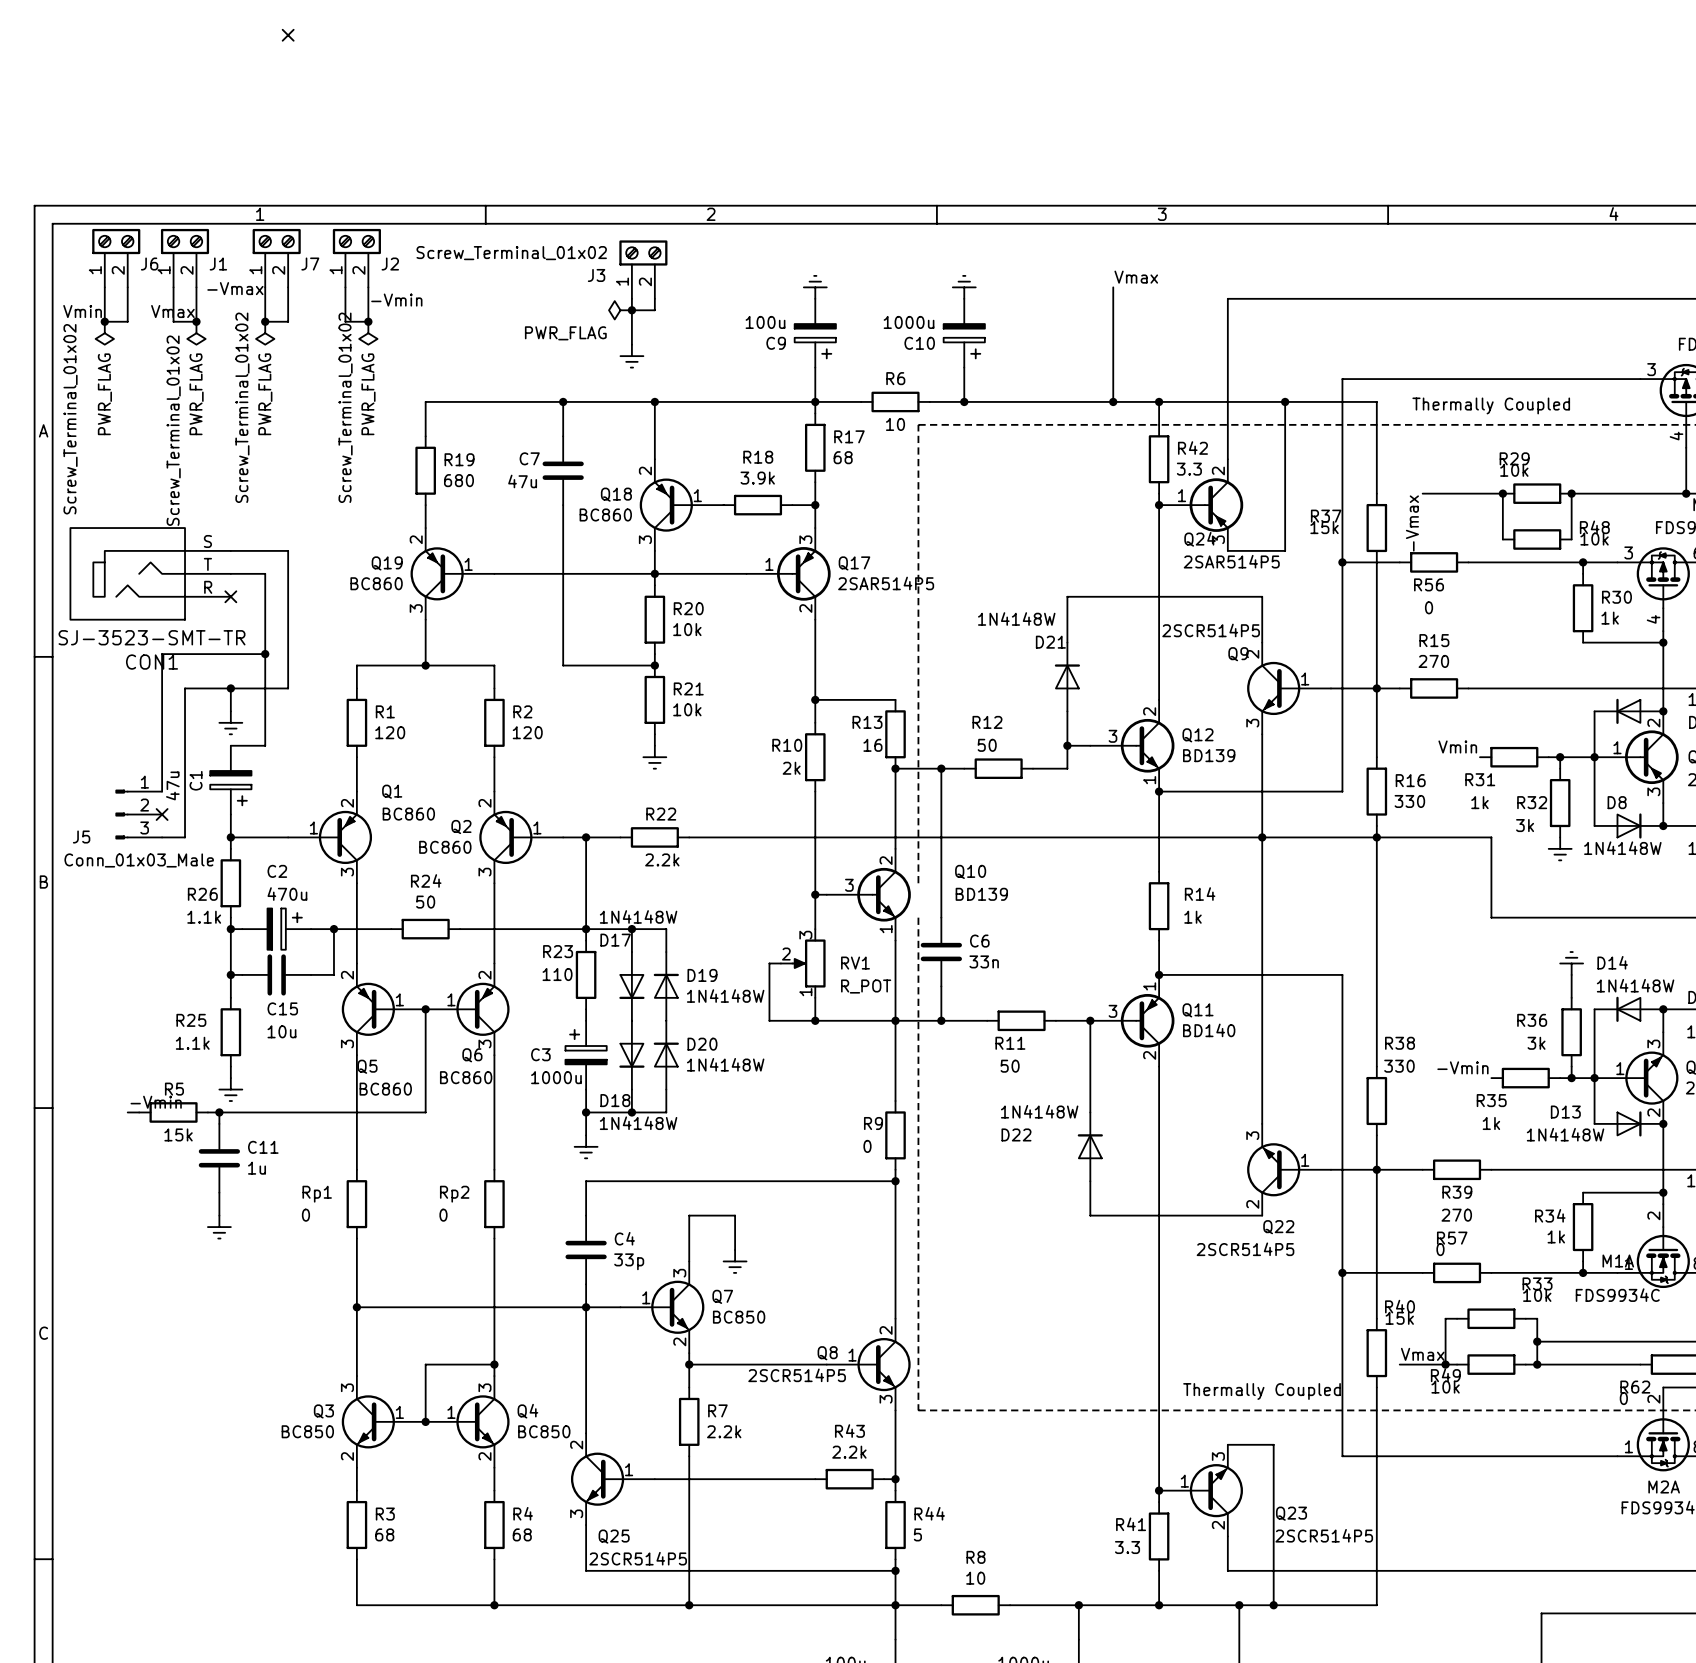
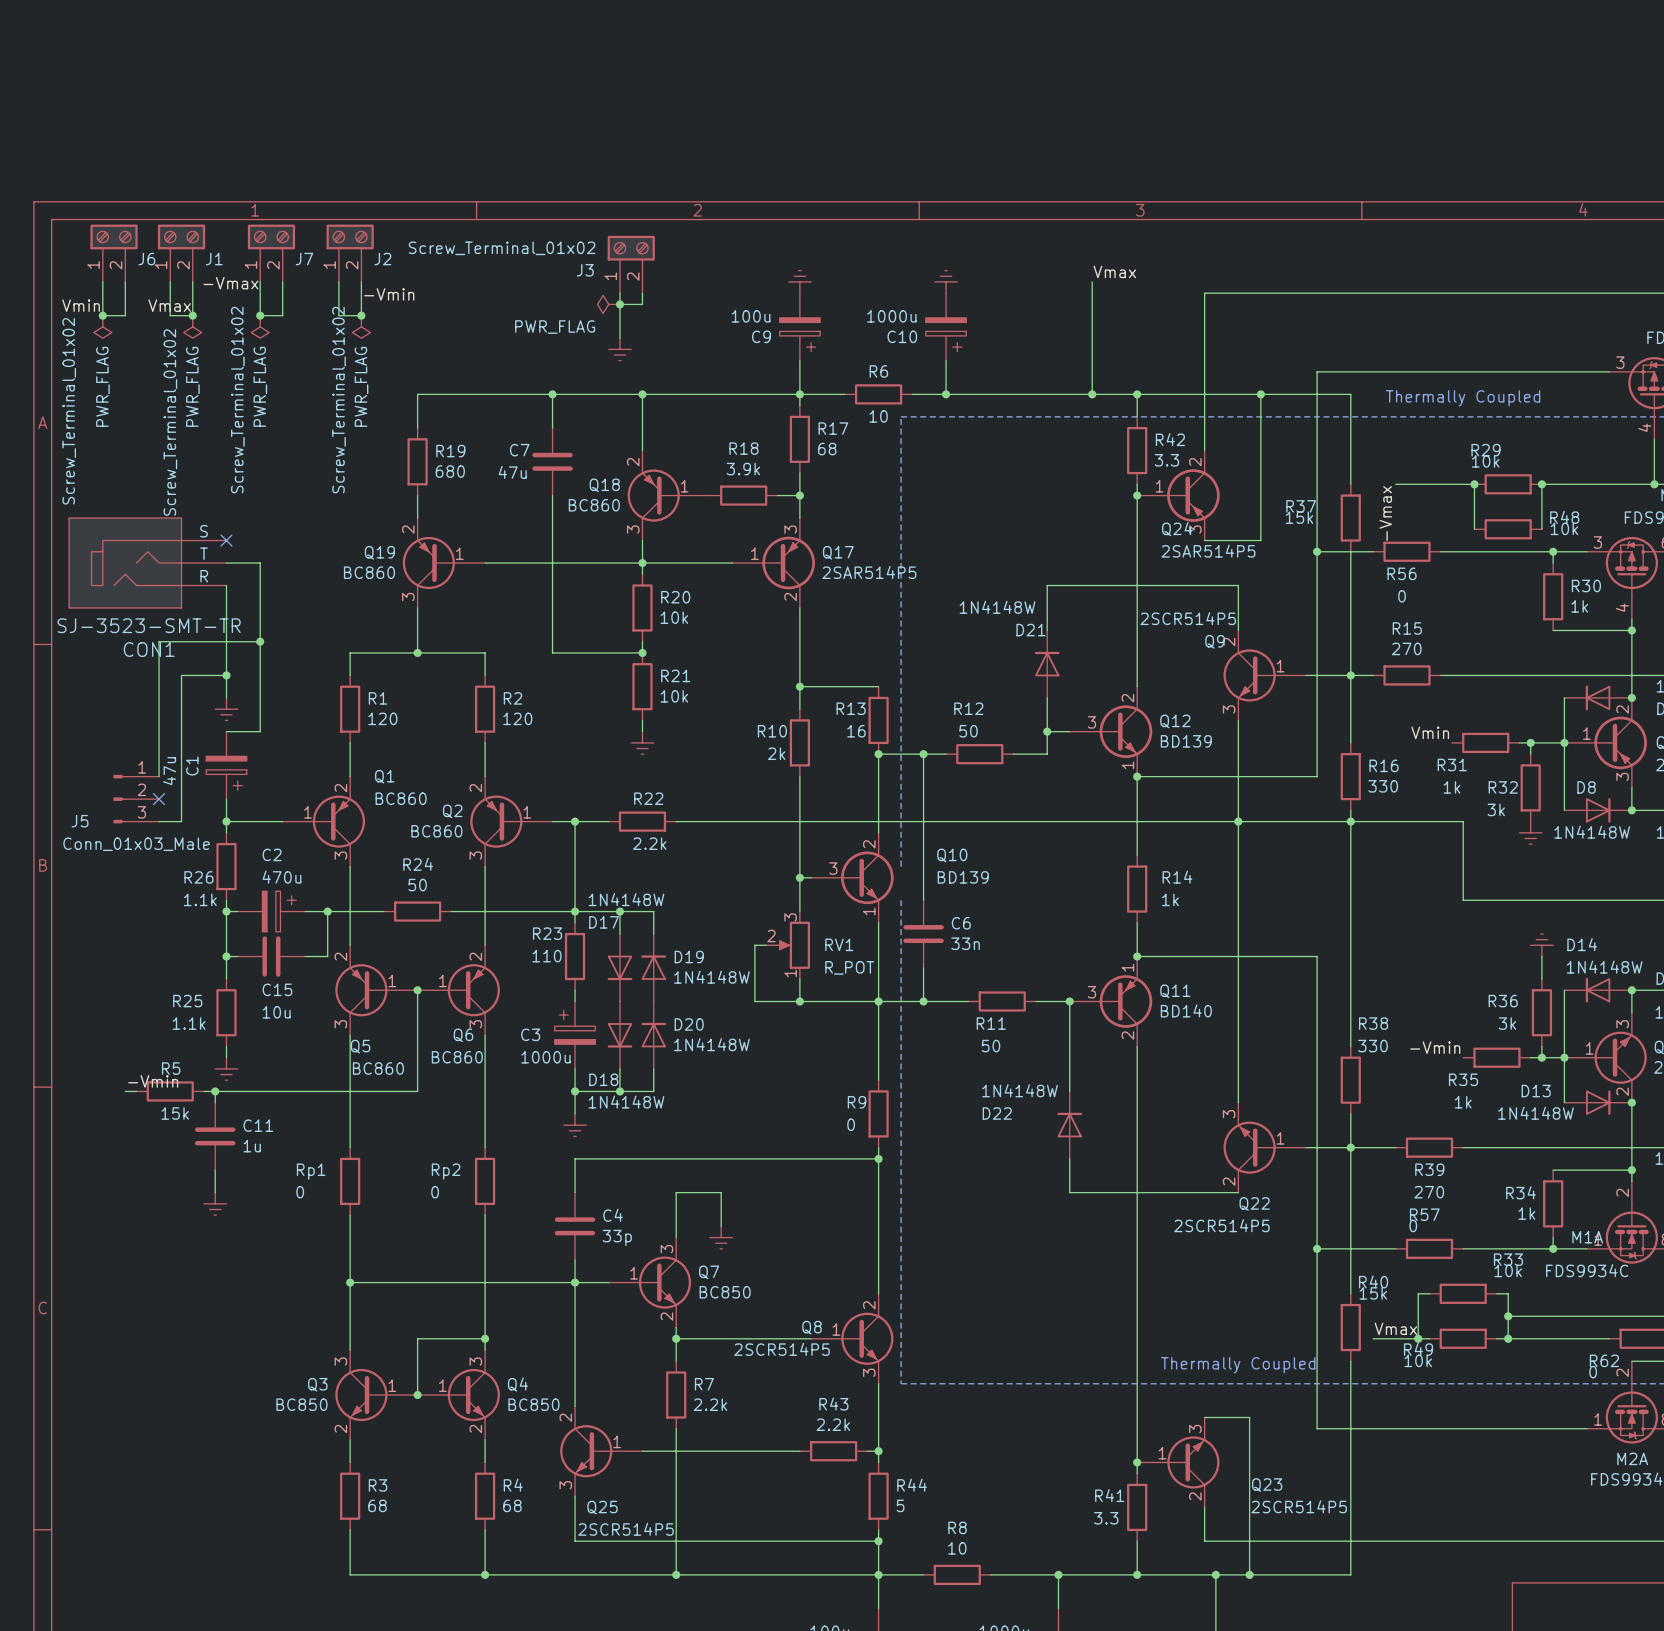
no-connect mark: (288, 35) -> none
wire: (230, 550) (288, 550) (288, 688) (230, 688) -> (226, 585) (226, 675)
no-connect mark position: (230, 596) -> (226, 540)

